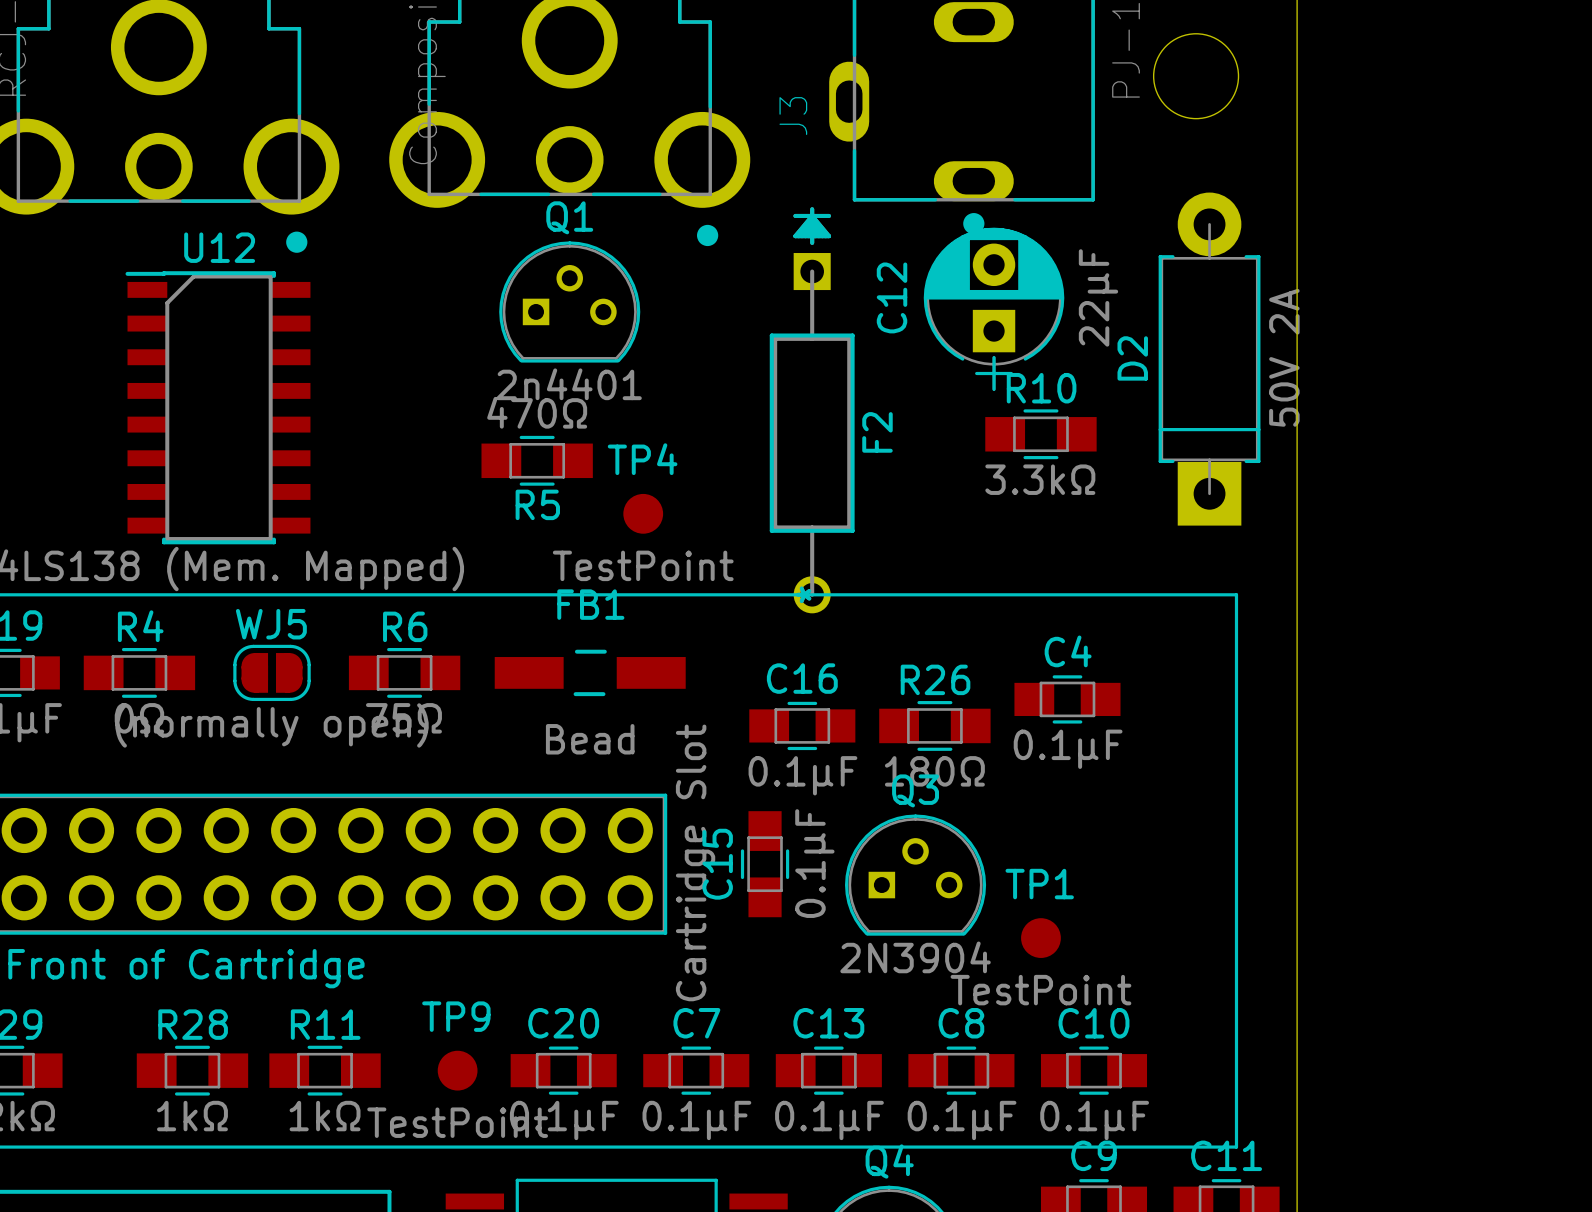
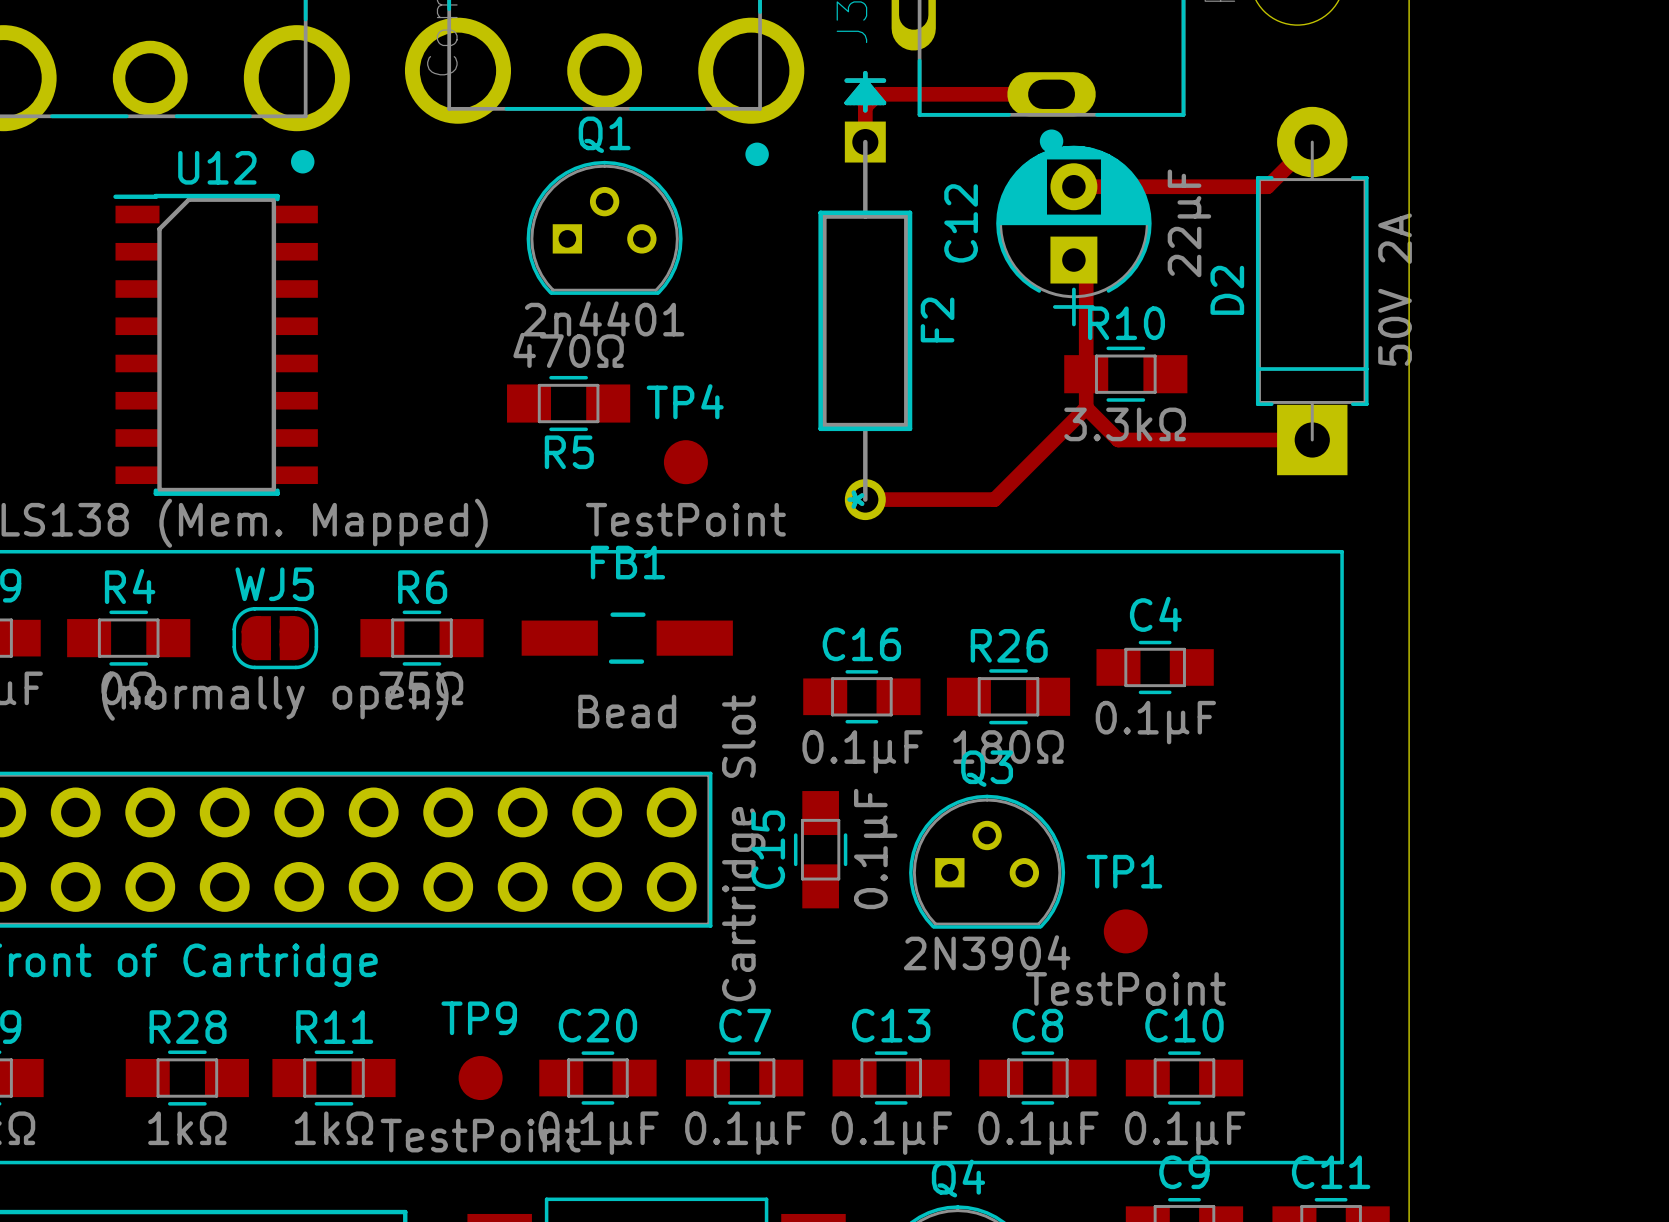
track: none -> (1051, 94) (877, 94) (865, 106) (865, 142)
track: none -> (1312, 142) (1267, 186) (1073, 186)
track: none -> (1073, 260) (1086, 272) (1086, 407)
F2 position: (812, 410) -> (865, 295)
track: none -> (1086, 407) (994, 499) (865, 499)
track: none -> (1086, 407) (1118, 440) (1312, 440)

